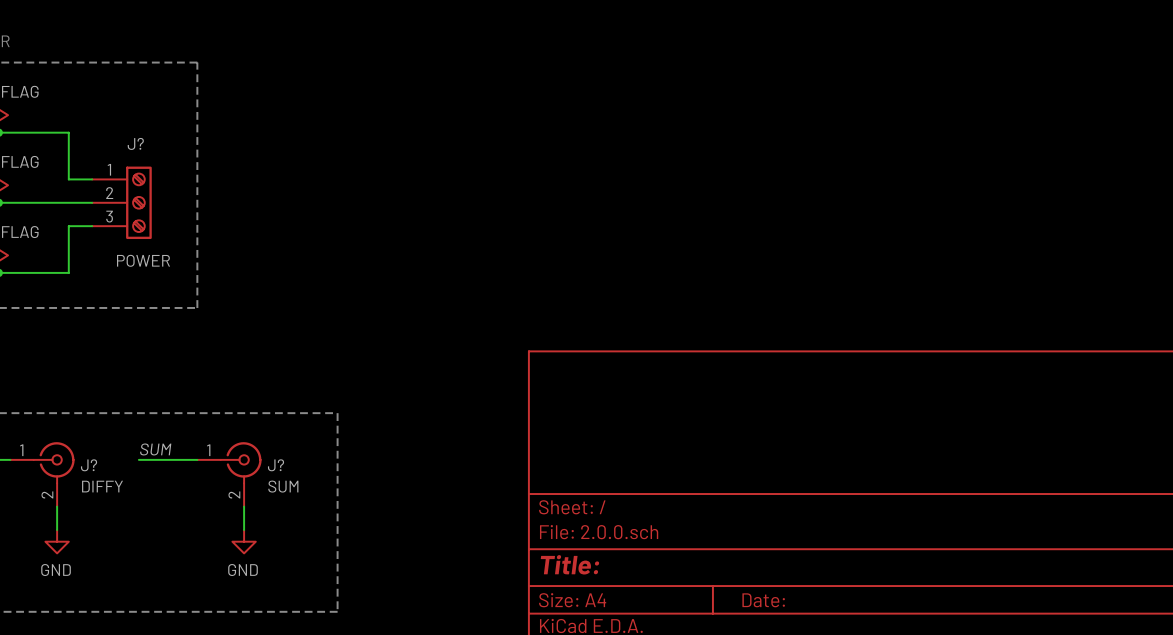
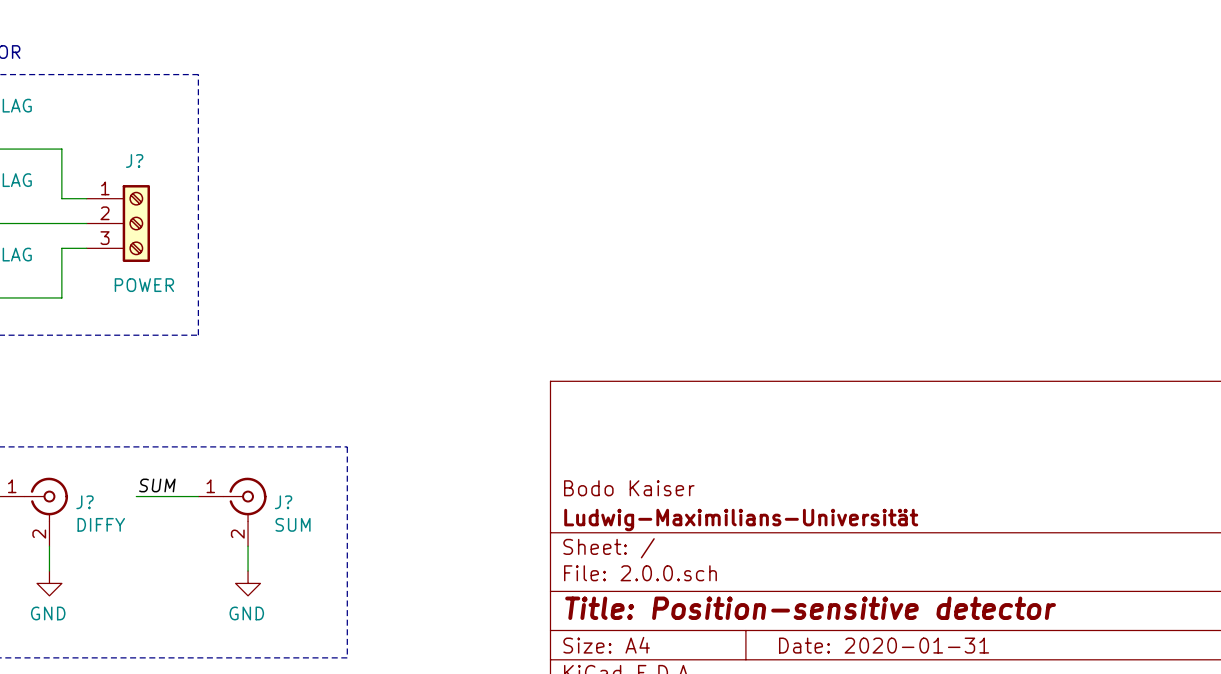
title block: none -> Bodo Kaiser (629, 488)
title block: none -> Ludwig-Maximilians-Universität (741, 520)
title block: Title: (569, 564) -> Title: Position-sensitive detector (810, 608)
title block: Date: (763, 600) -> Date: 2020-01-31 (884, 645)

